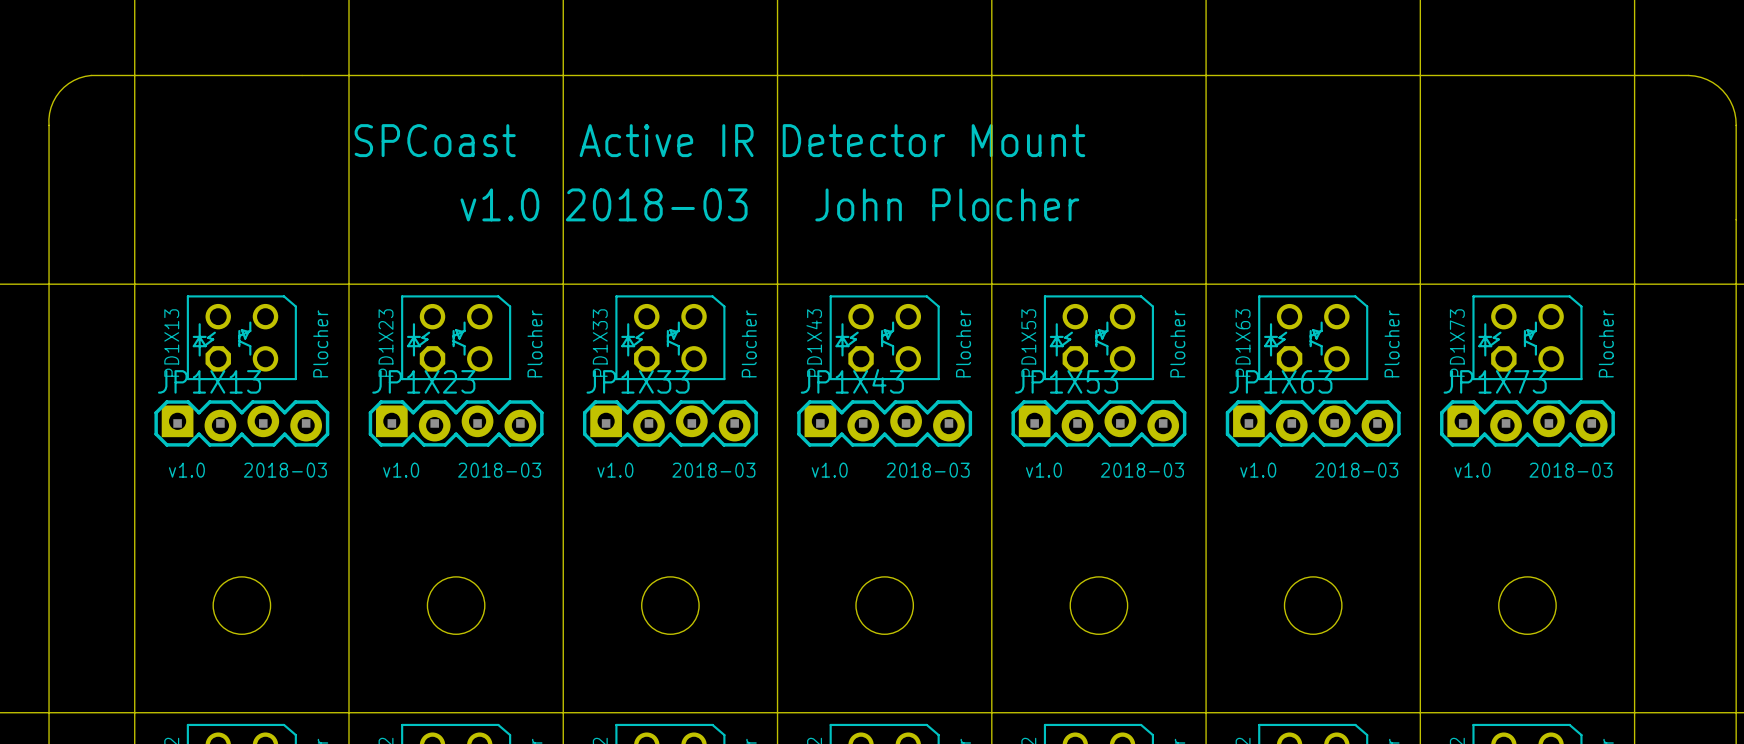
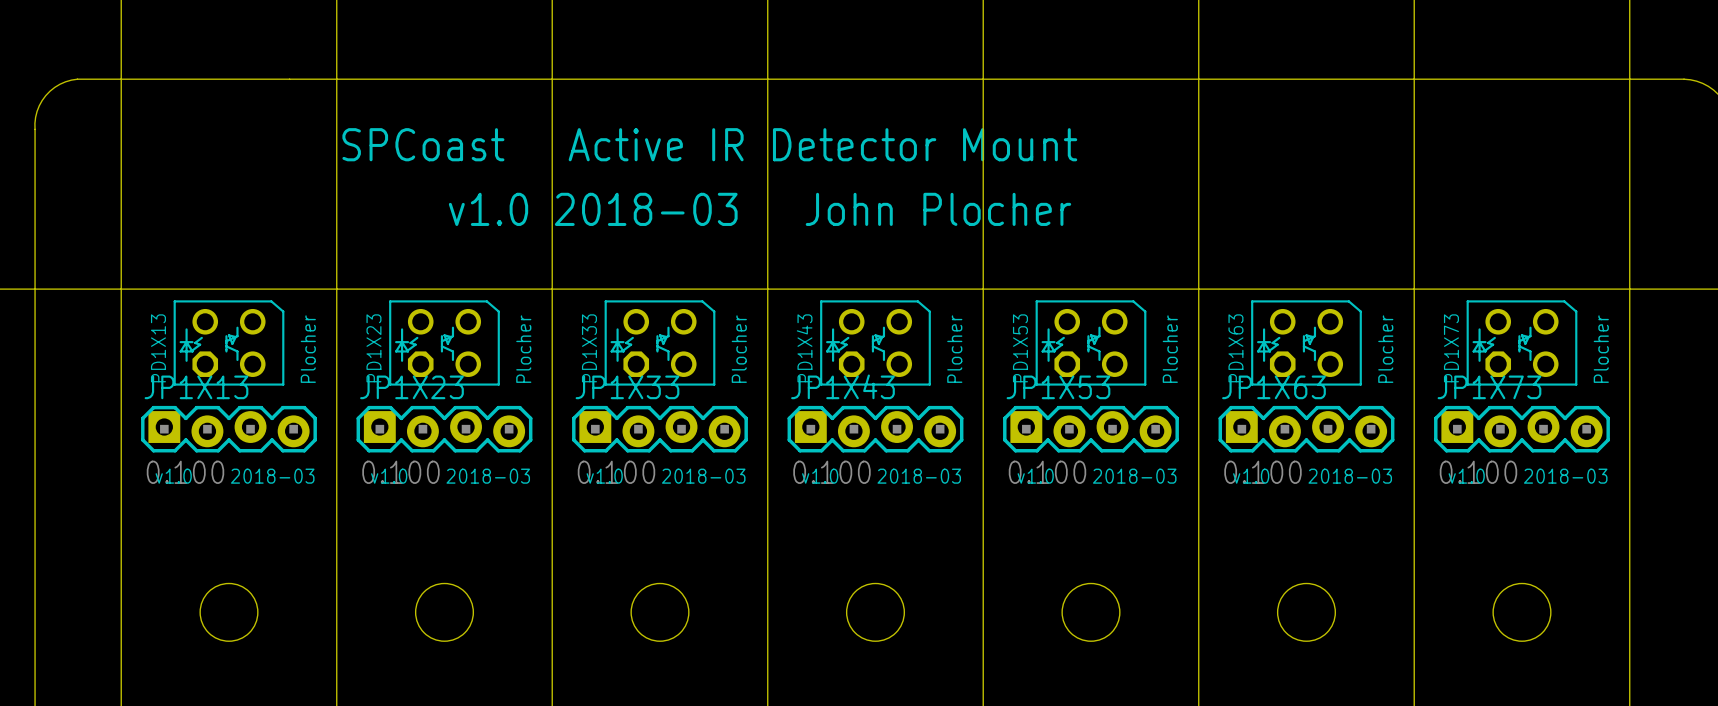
JP1X13 value: none -> 0.100 (185, 472)
JP1X23 value: none -> 0.100 (400, 472)
JP1X33 value: none -> 0.100 (616, 472)
JP1X43 value: none -> 0.100 (831, 472)
JP1X53 value: none -> 0.100 (1047, 472)
JP1X63 value: none -> 0.100 (1262, 472)
JP1X73 value: none -> 0.100 (1478, 472)

